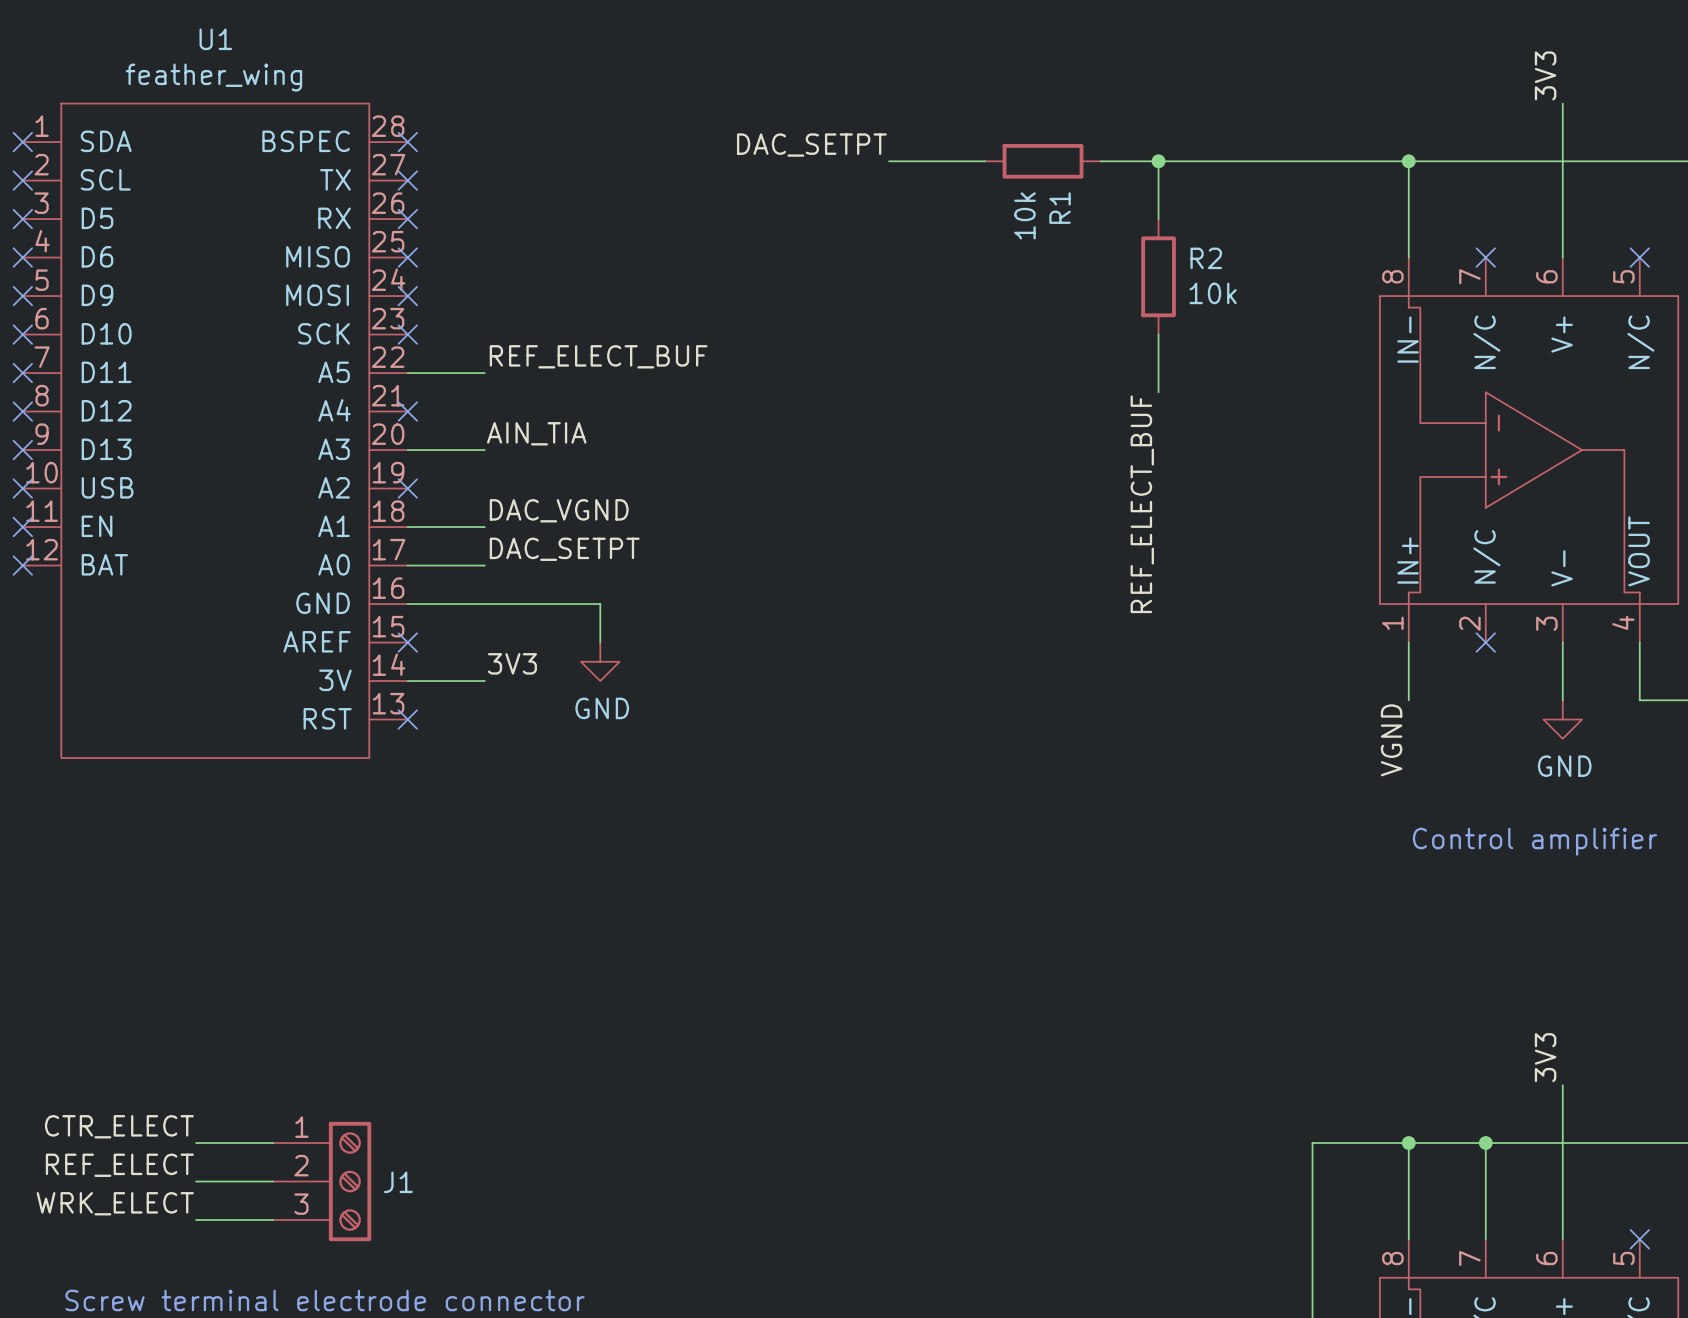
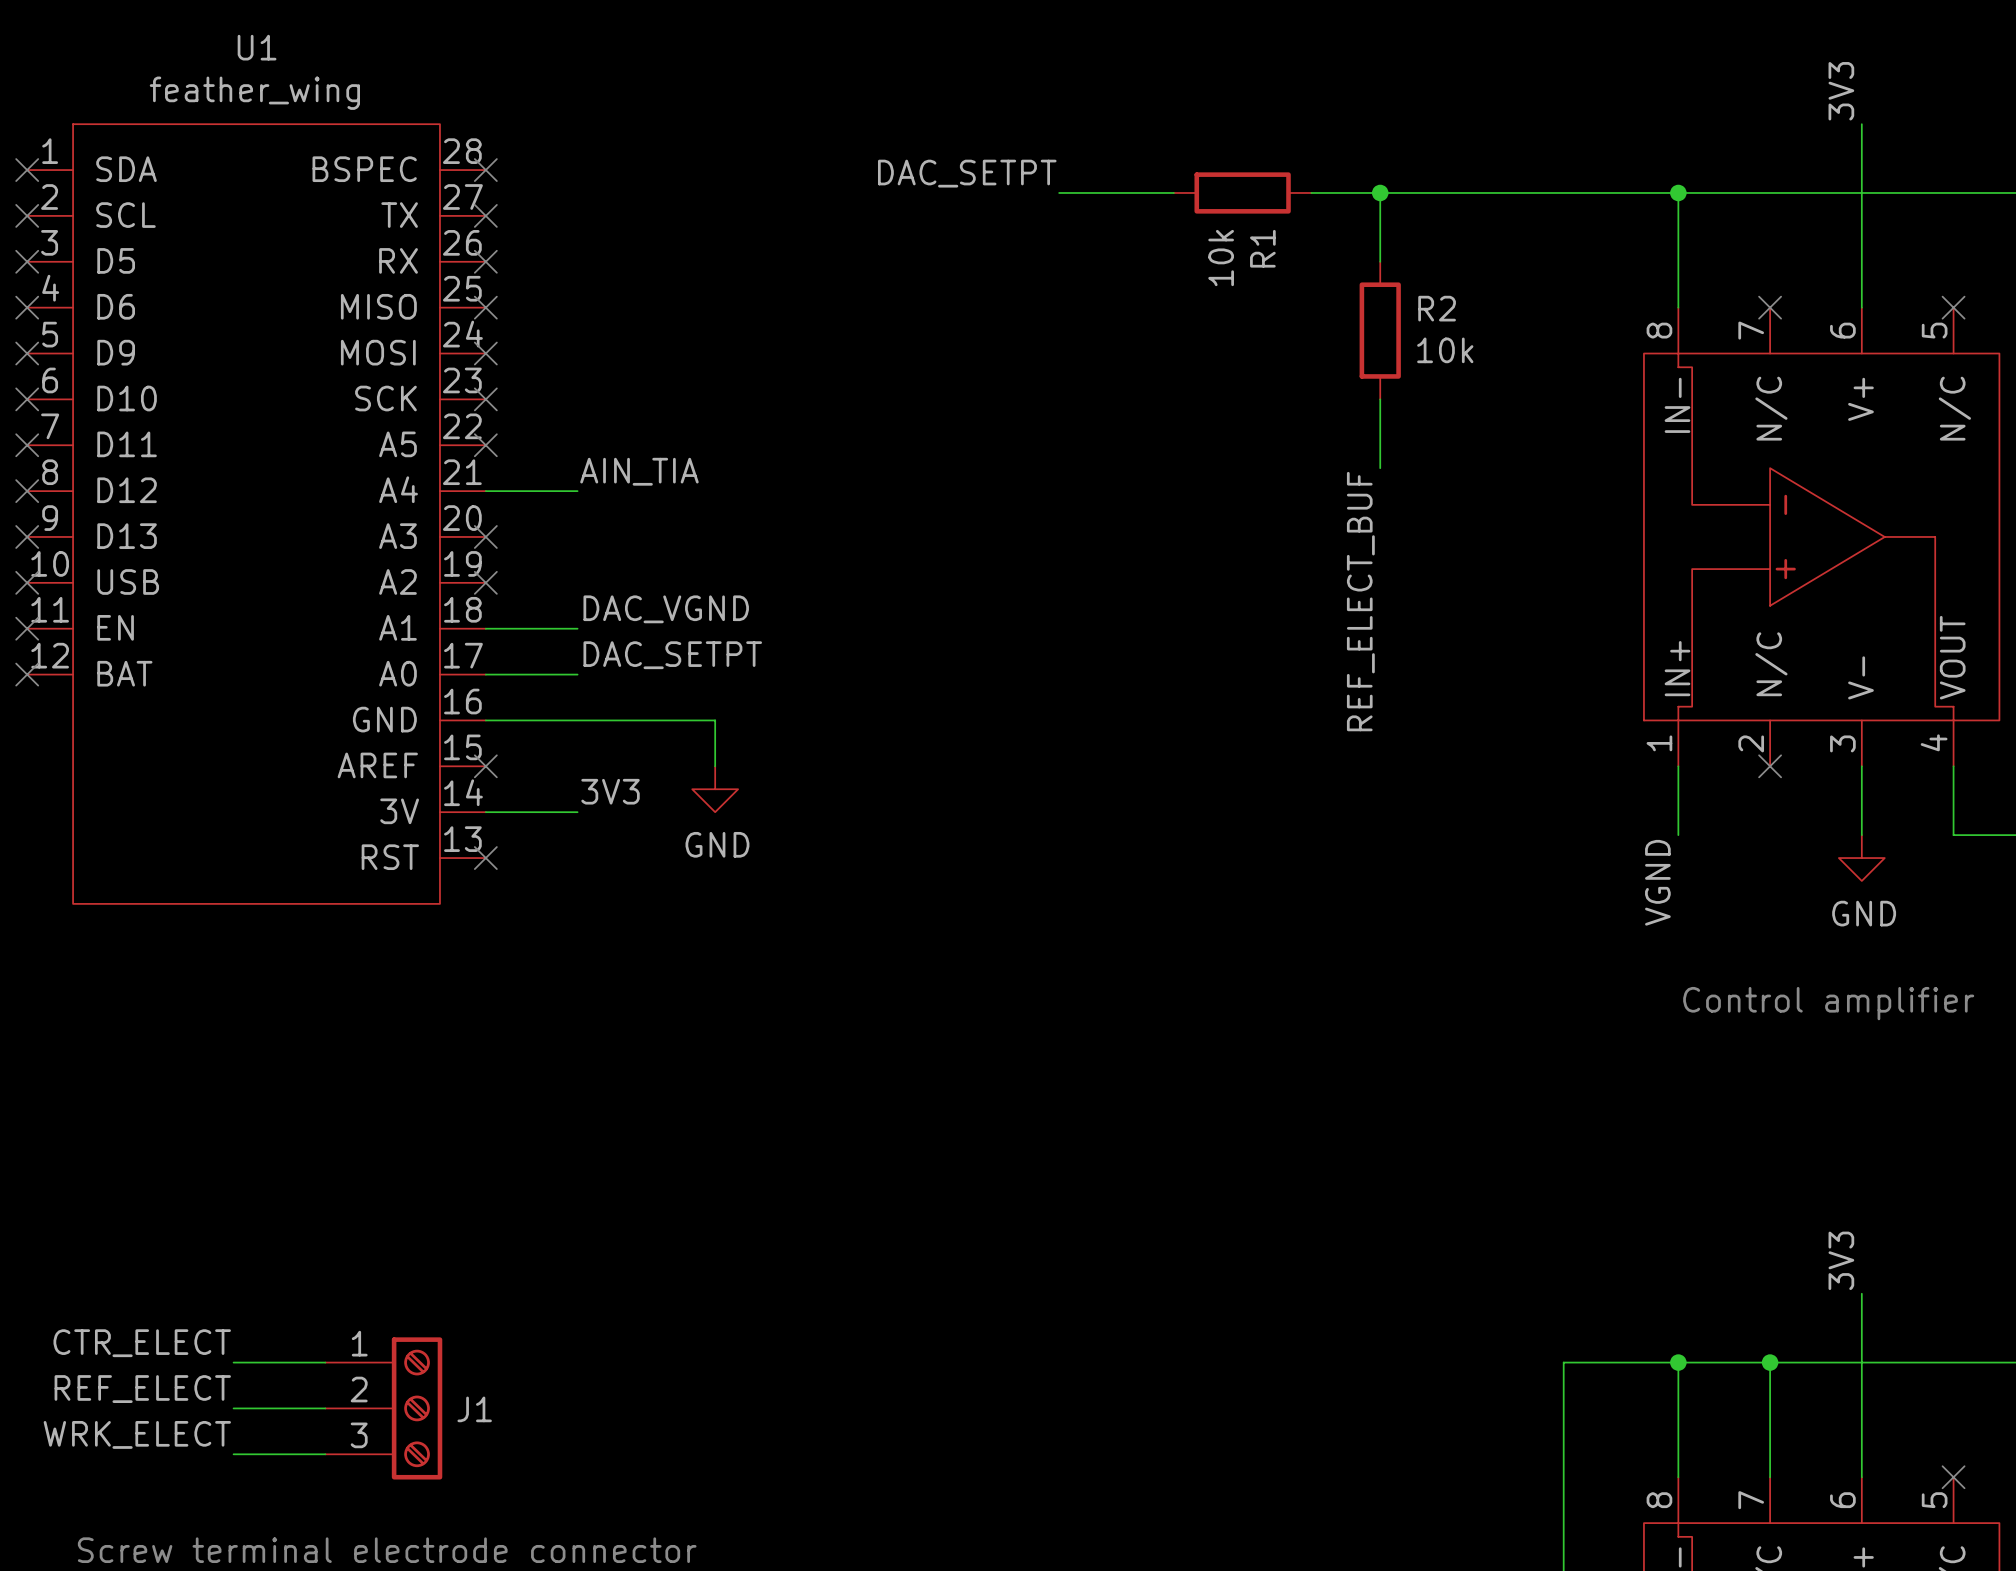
label: REF_ELECT_BUF (598, 356) -> none
wire: (407, 373) (484, 373) -> (485, 491) (577, 491)
no-connect mark: none -> (485, 445)
no-connect mark: (407, 411) -> none
label position: AIN_TIA (536, 433) -> AIN_TIA (639, 471)
wire: (407, 450) (484, 450) -> none
no-connect mark: none -> (485, 536)

